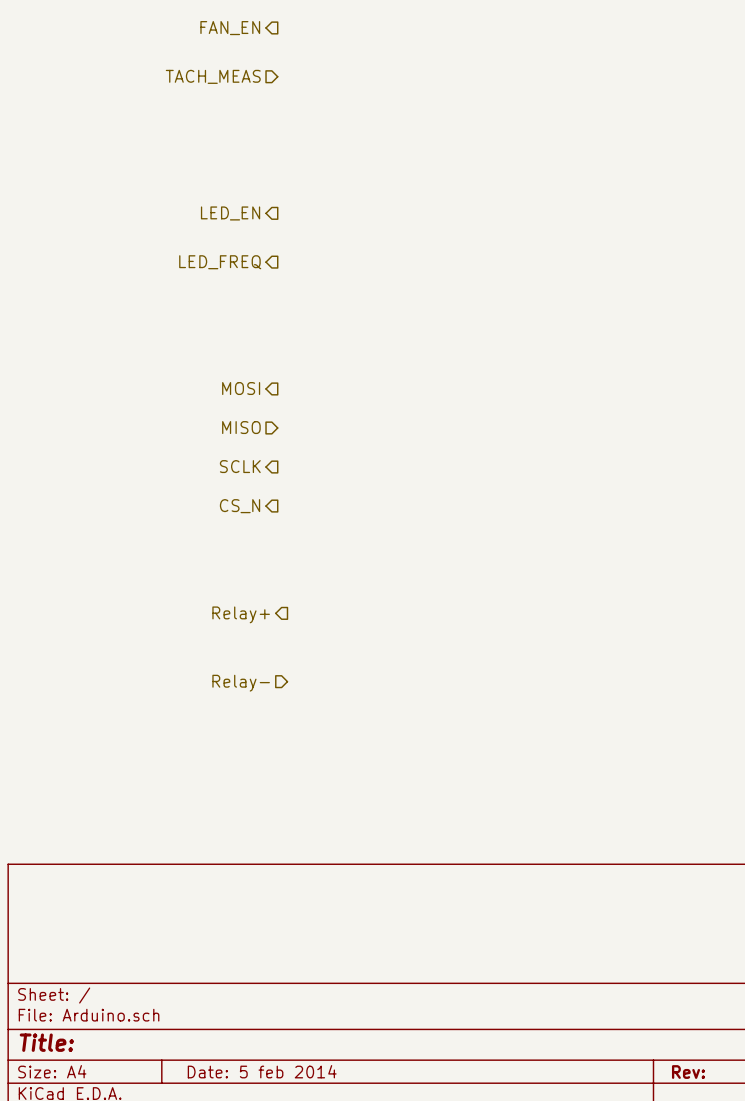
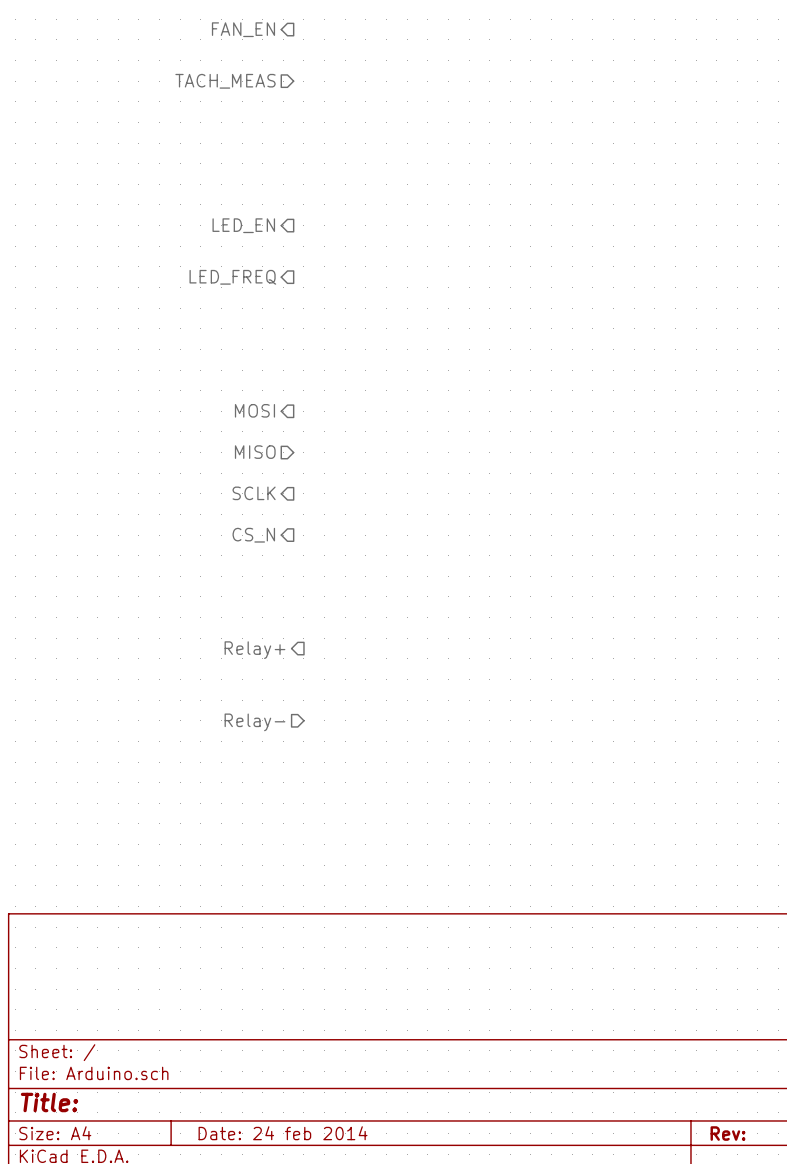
title block: Date: 5 feb 2014 (262, 1071) -> Date: 24 feb 2014 (283, 1133)

